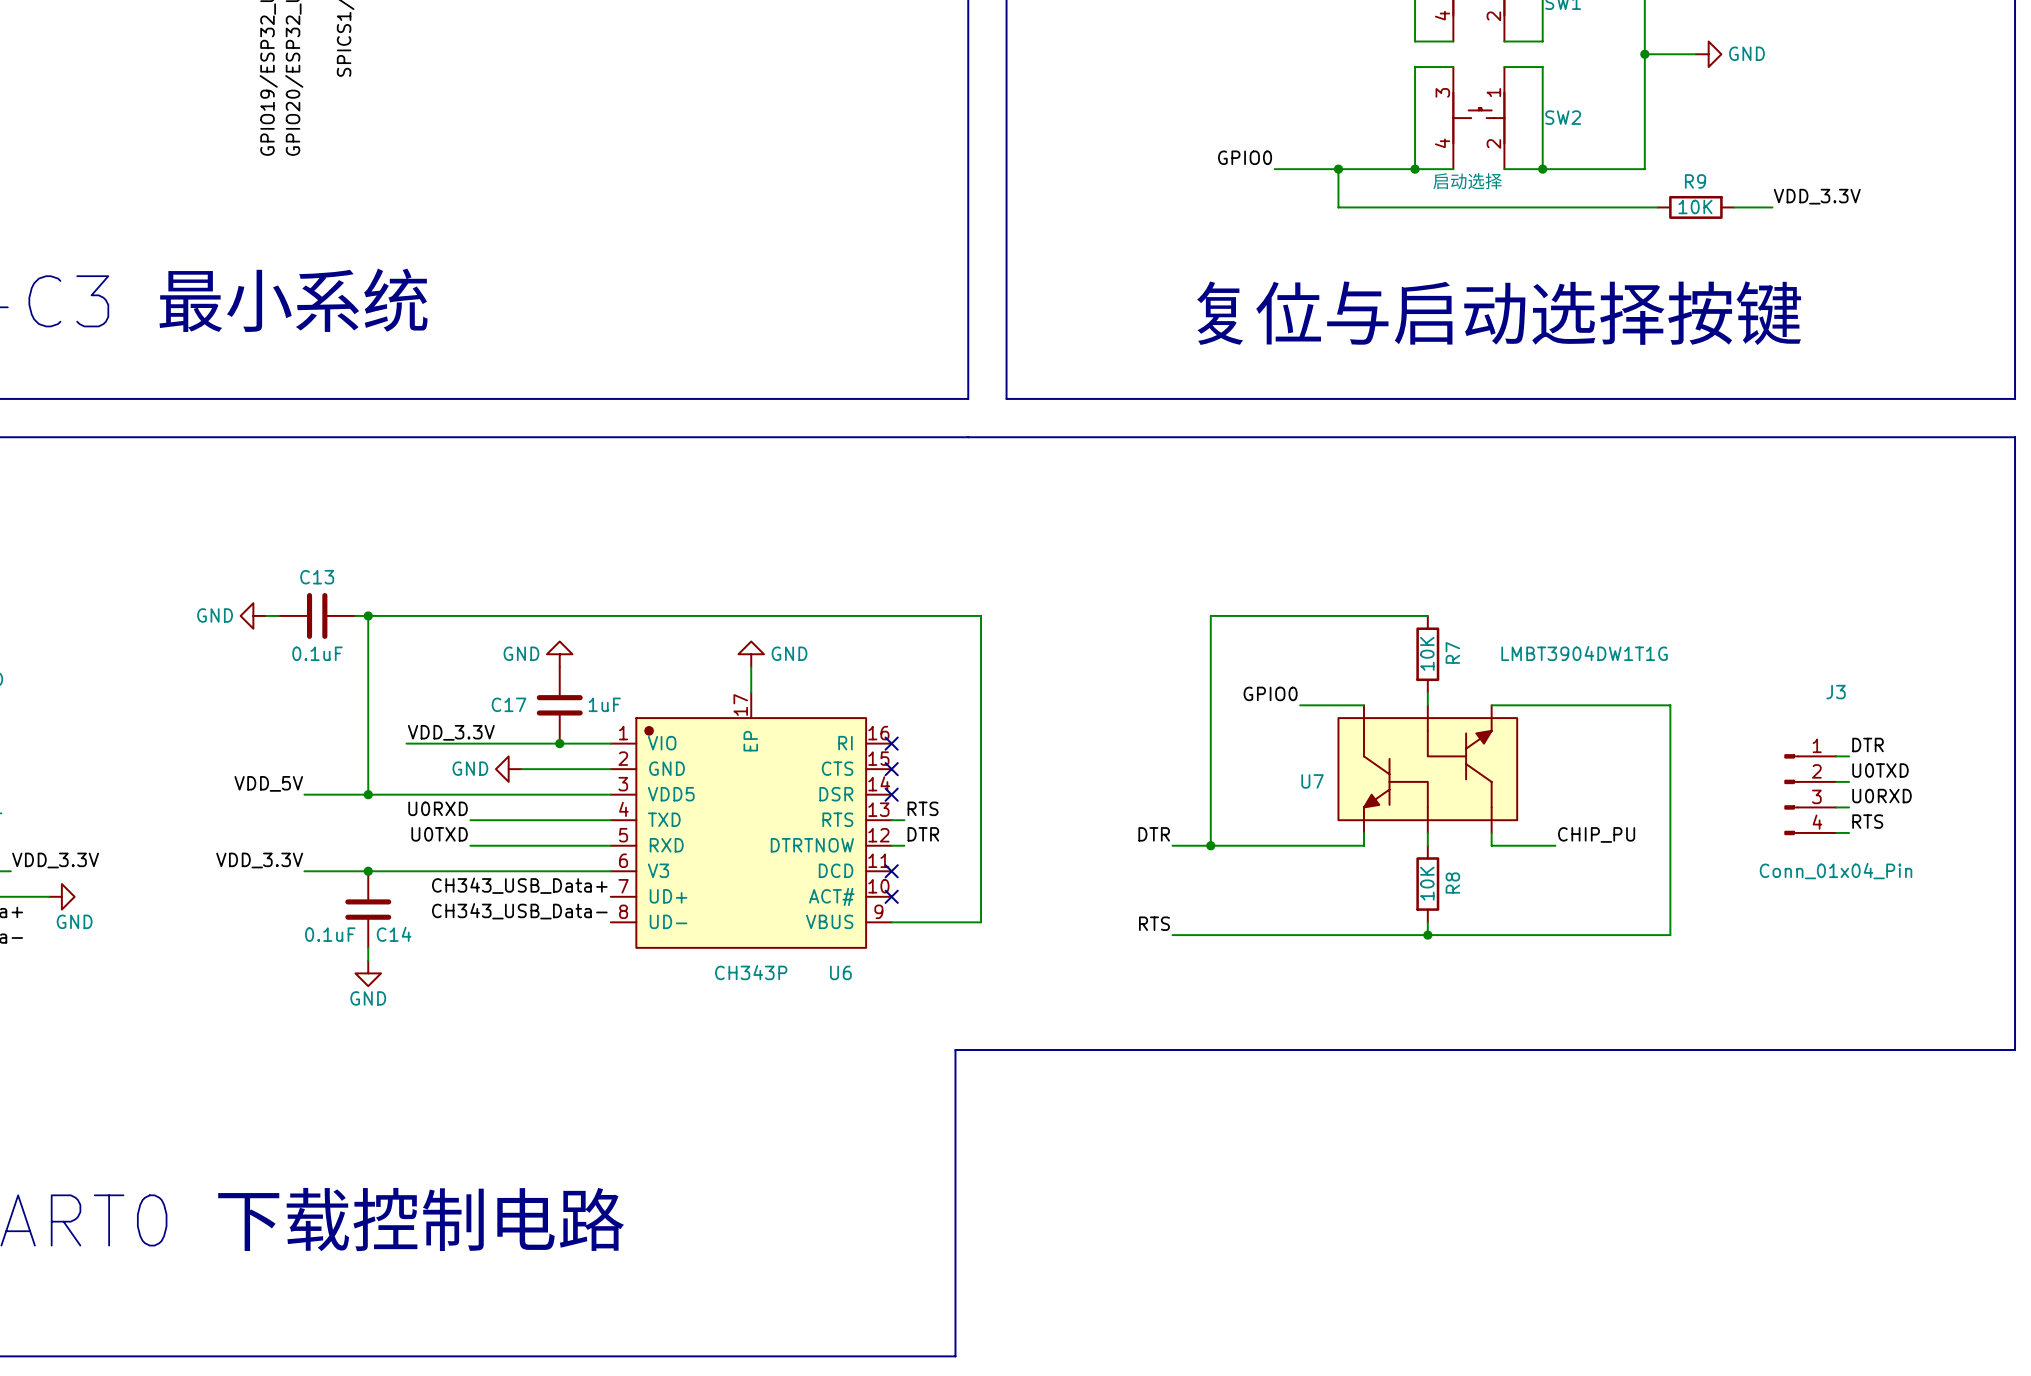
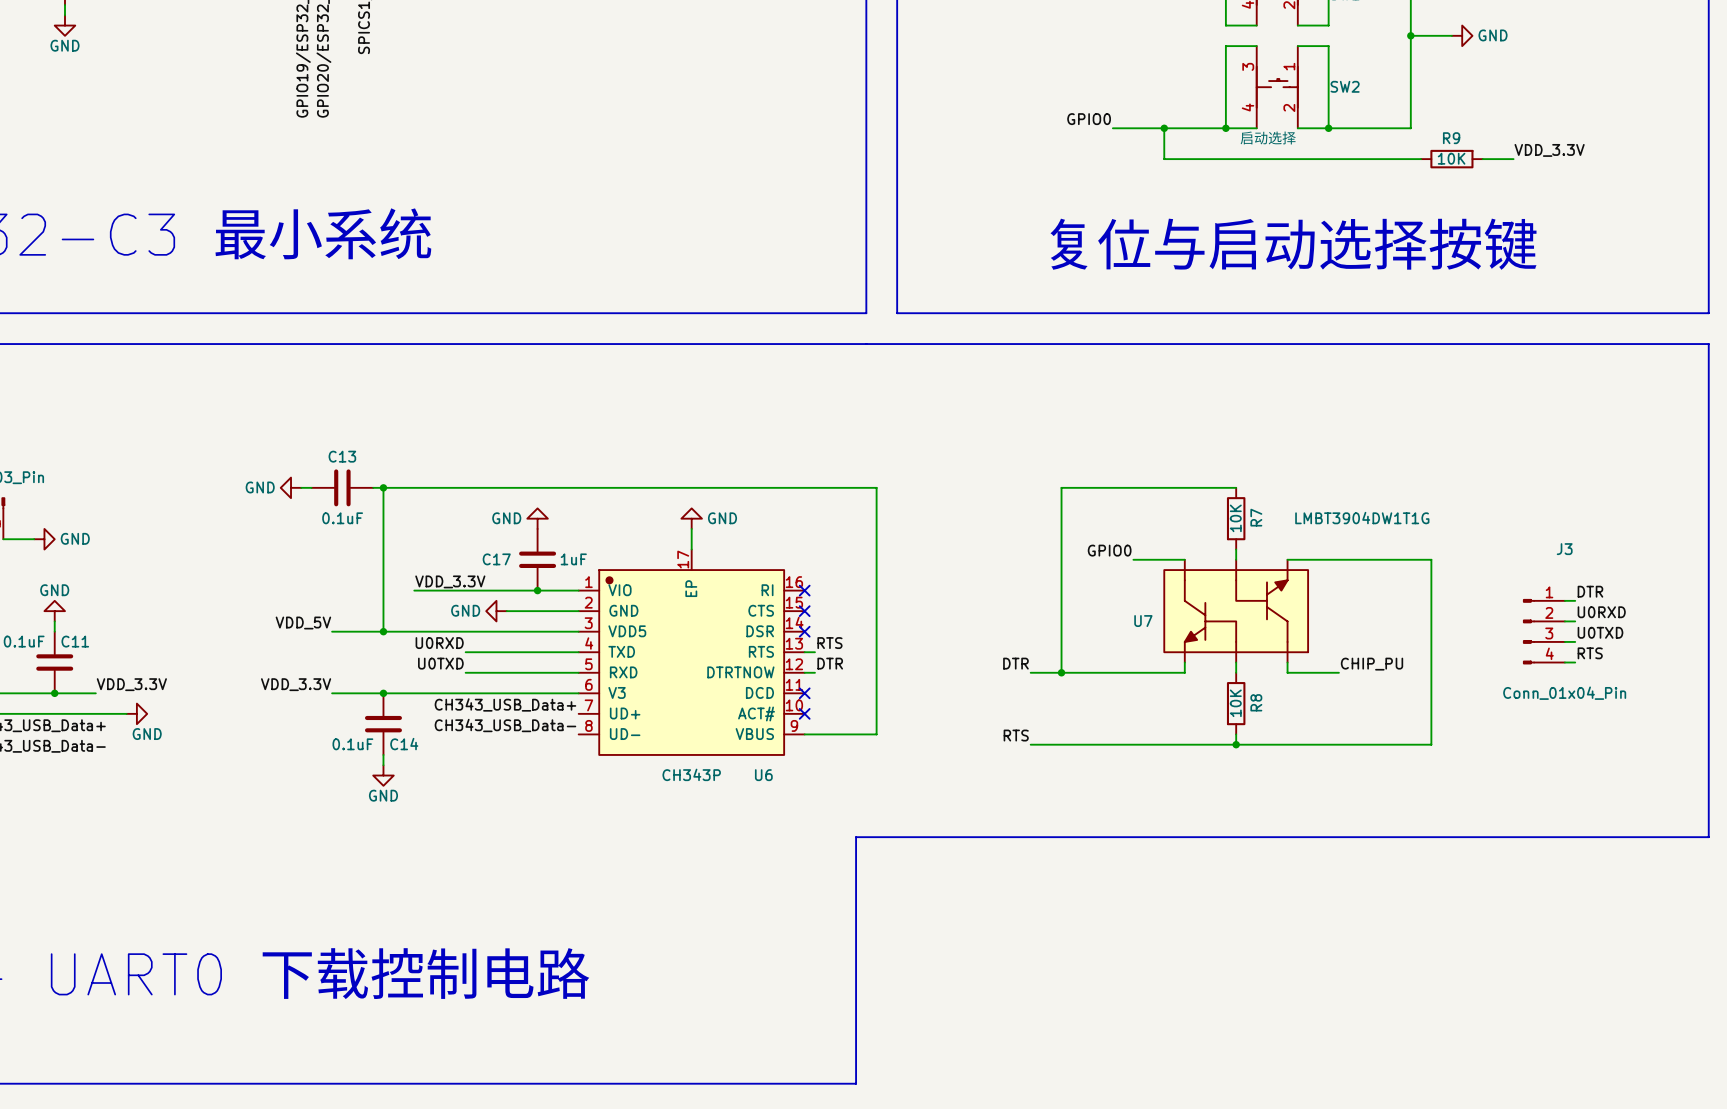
label: U0TXD (1880, 770) -> U0RXD (1601, 612)
label: U0RXD (1882, 796) -> U0TXD (1600, 632)

